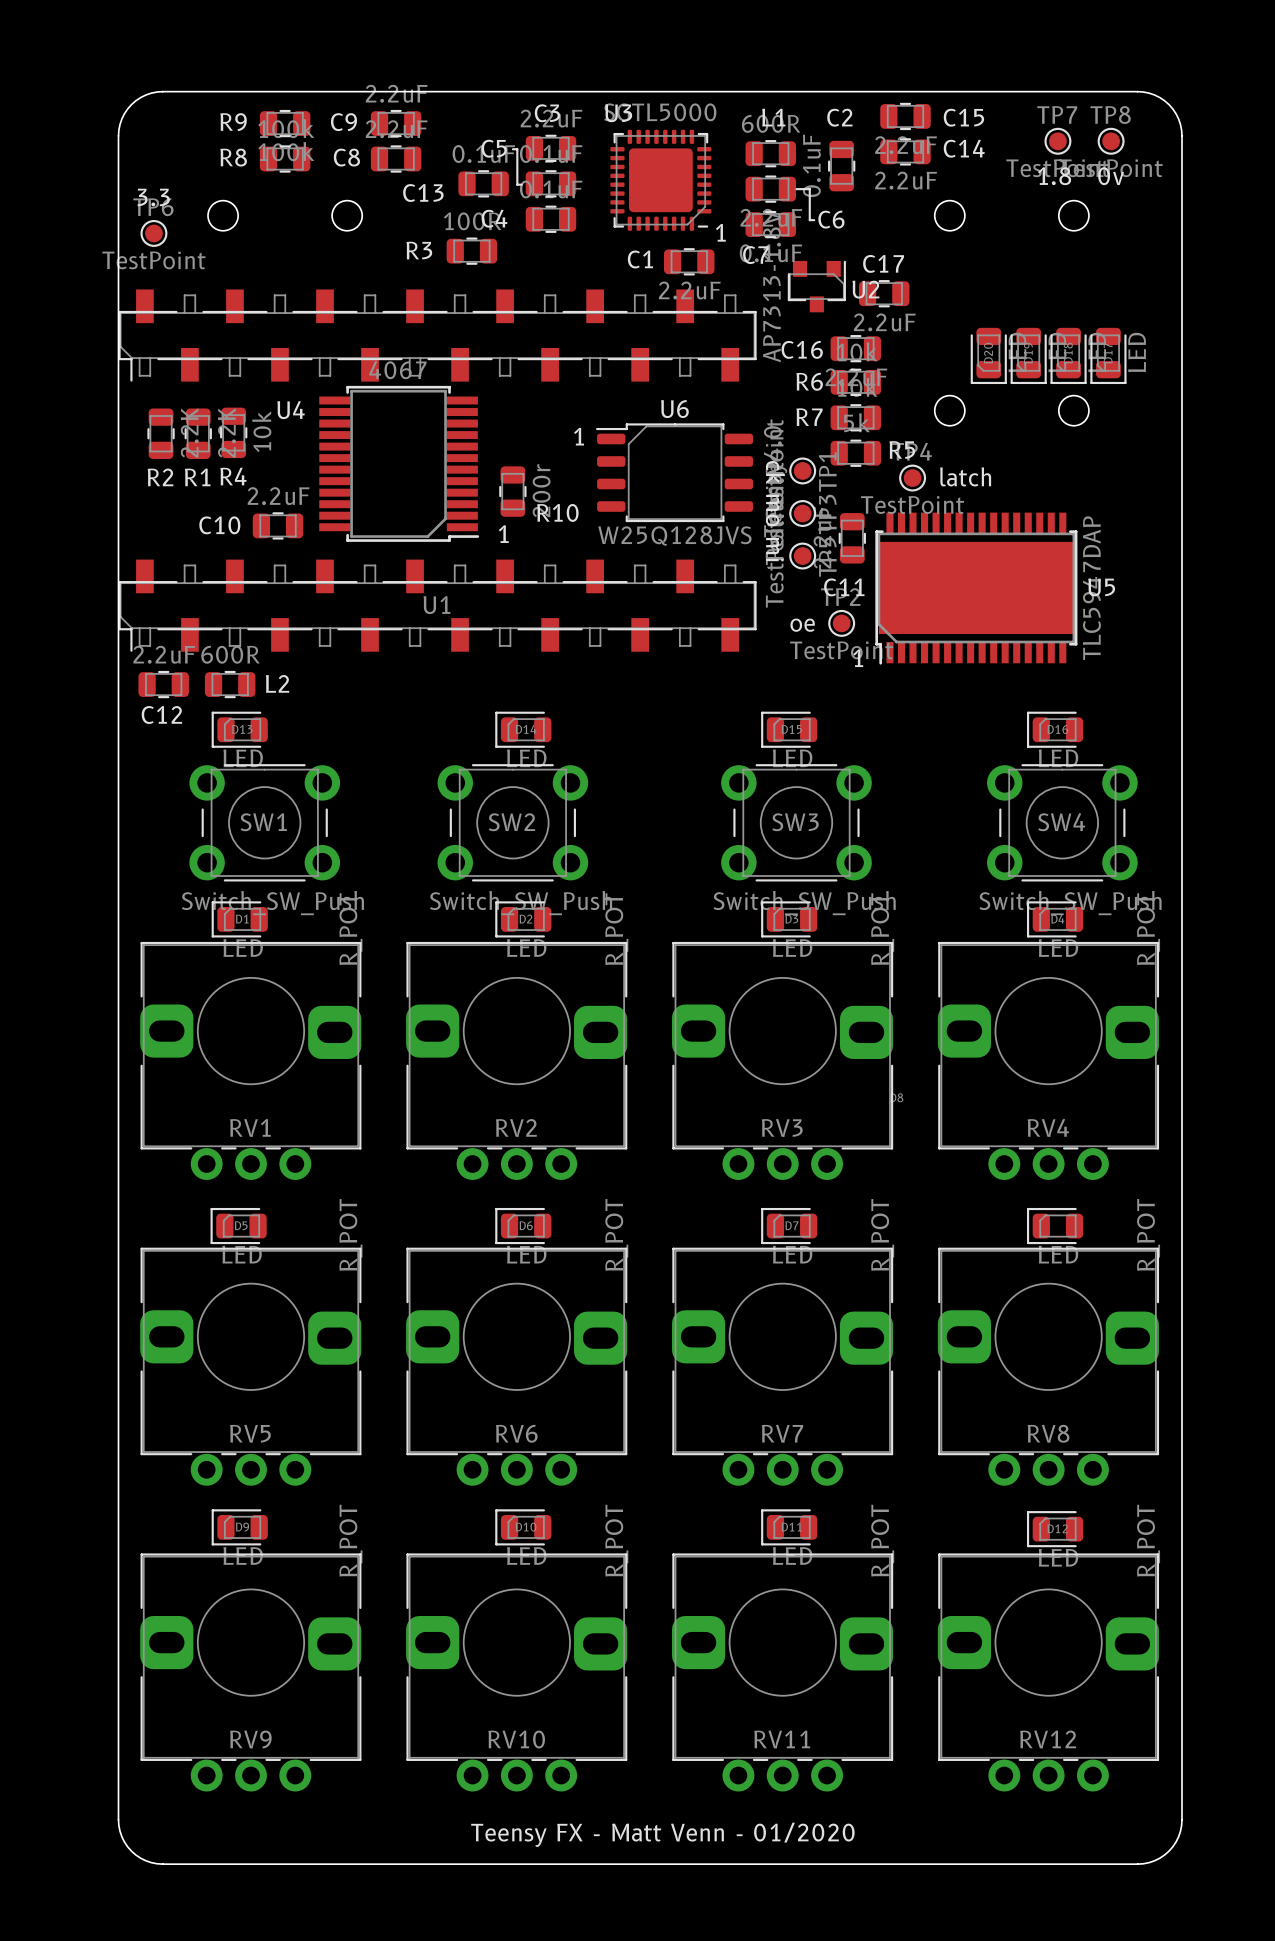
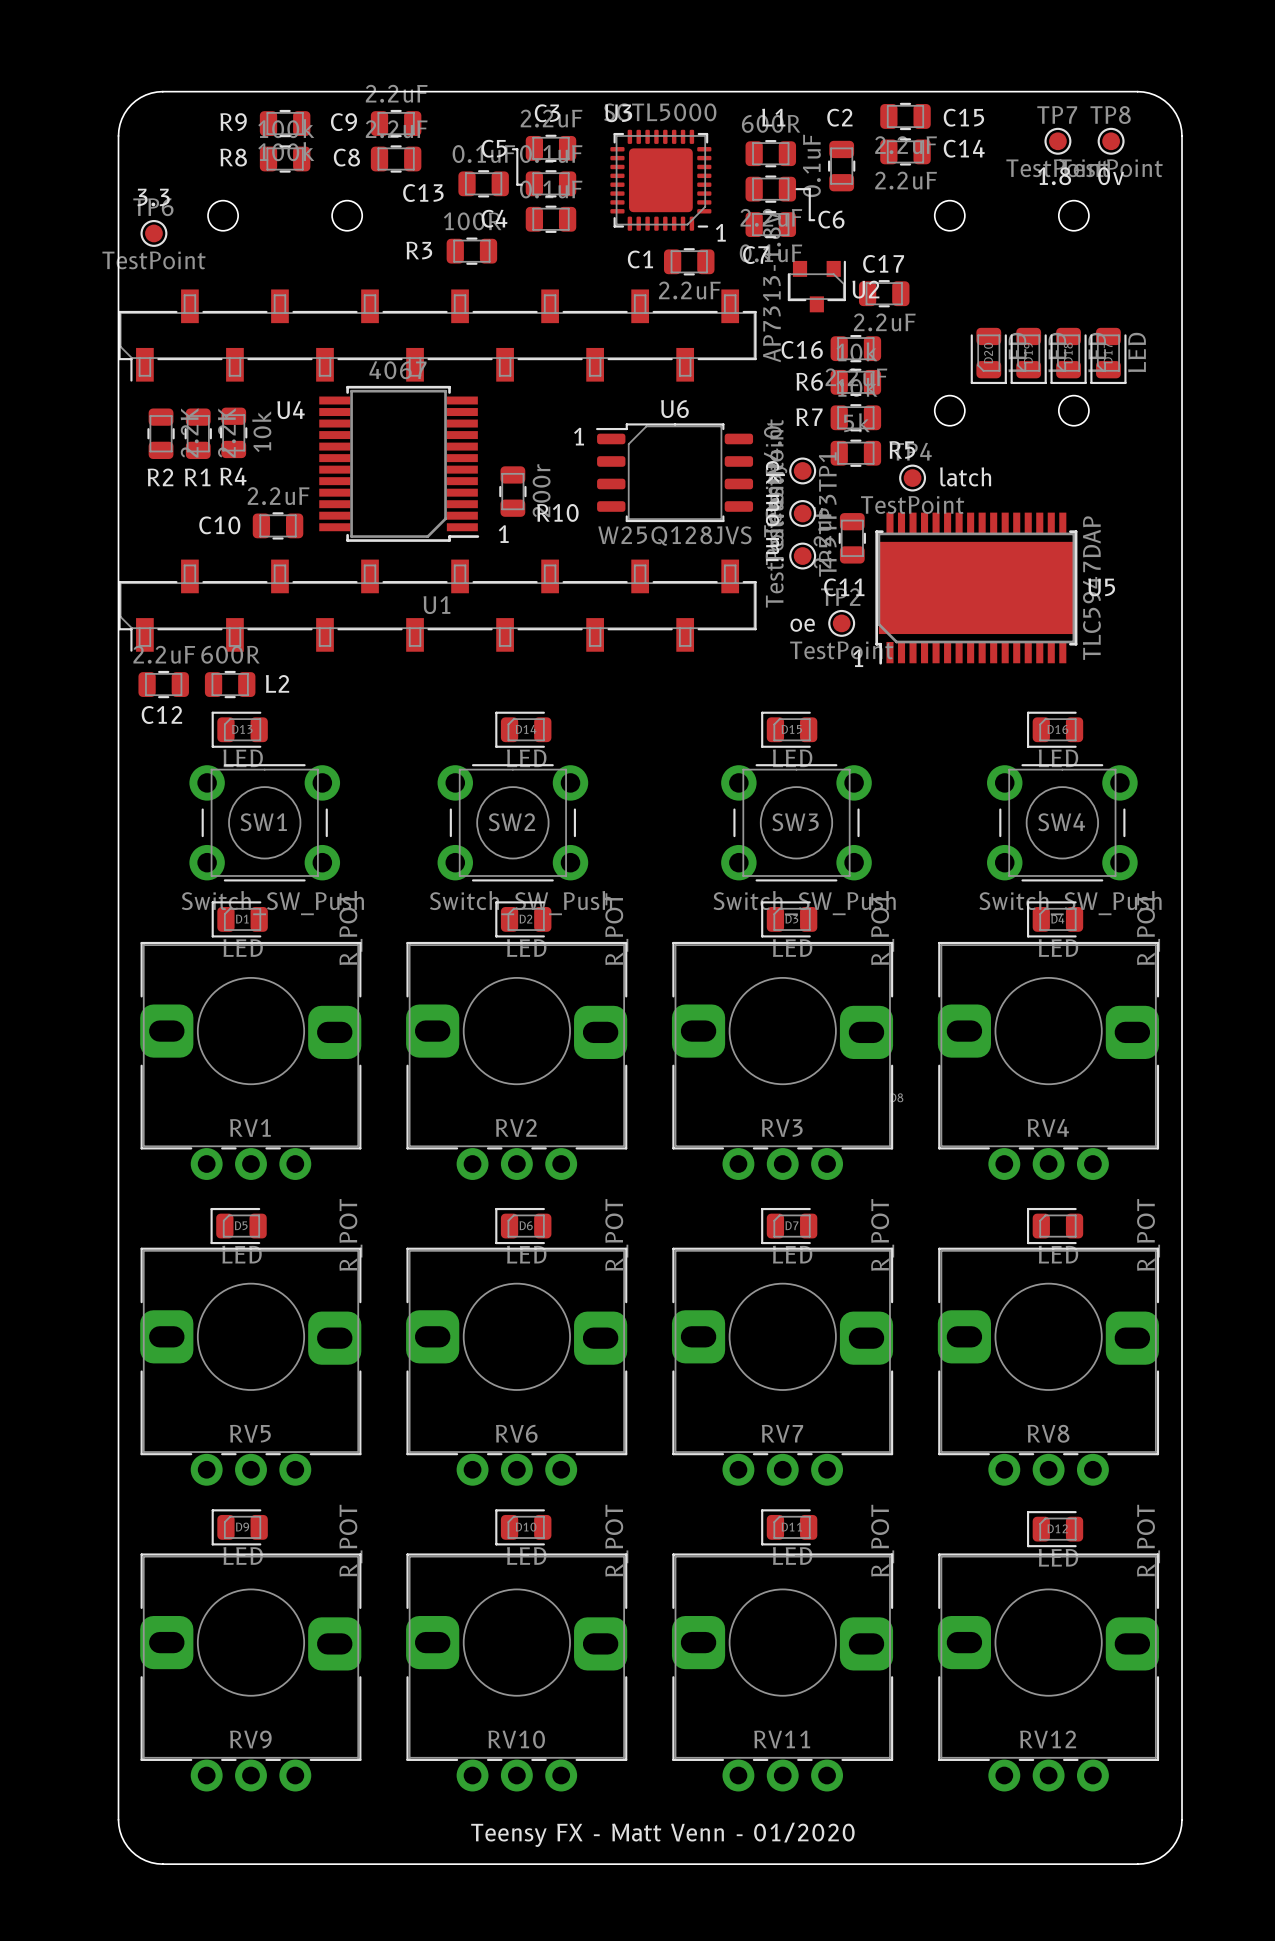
U1 footprint: [118, 289, 757, 652] -> [118, 289, 757, 652]

